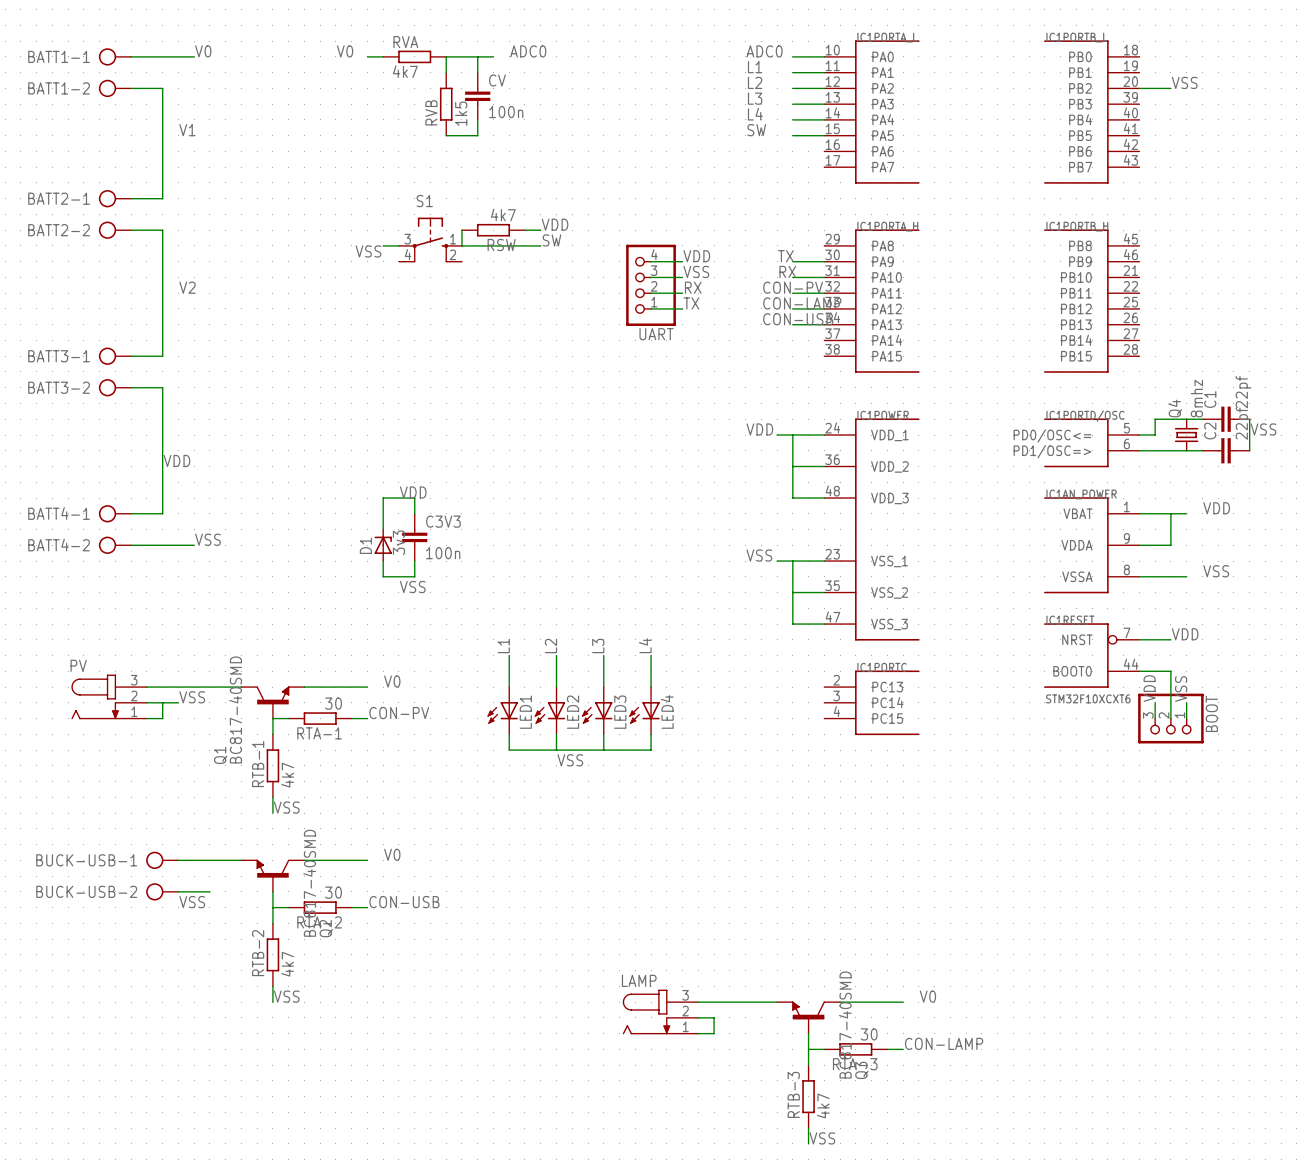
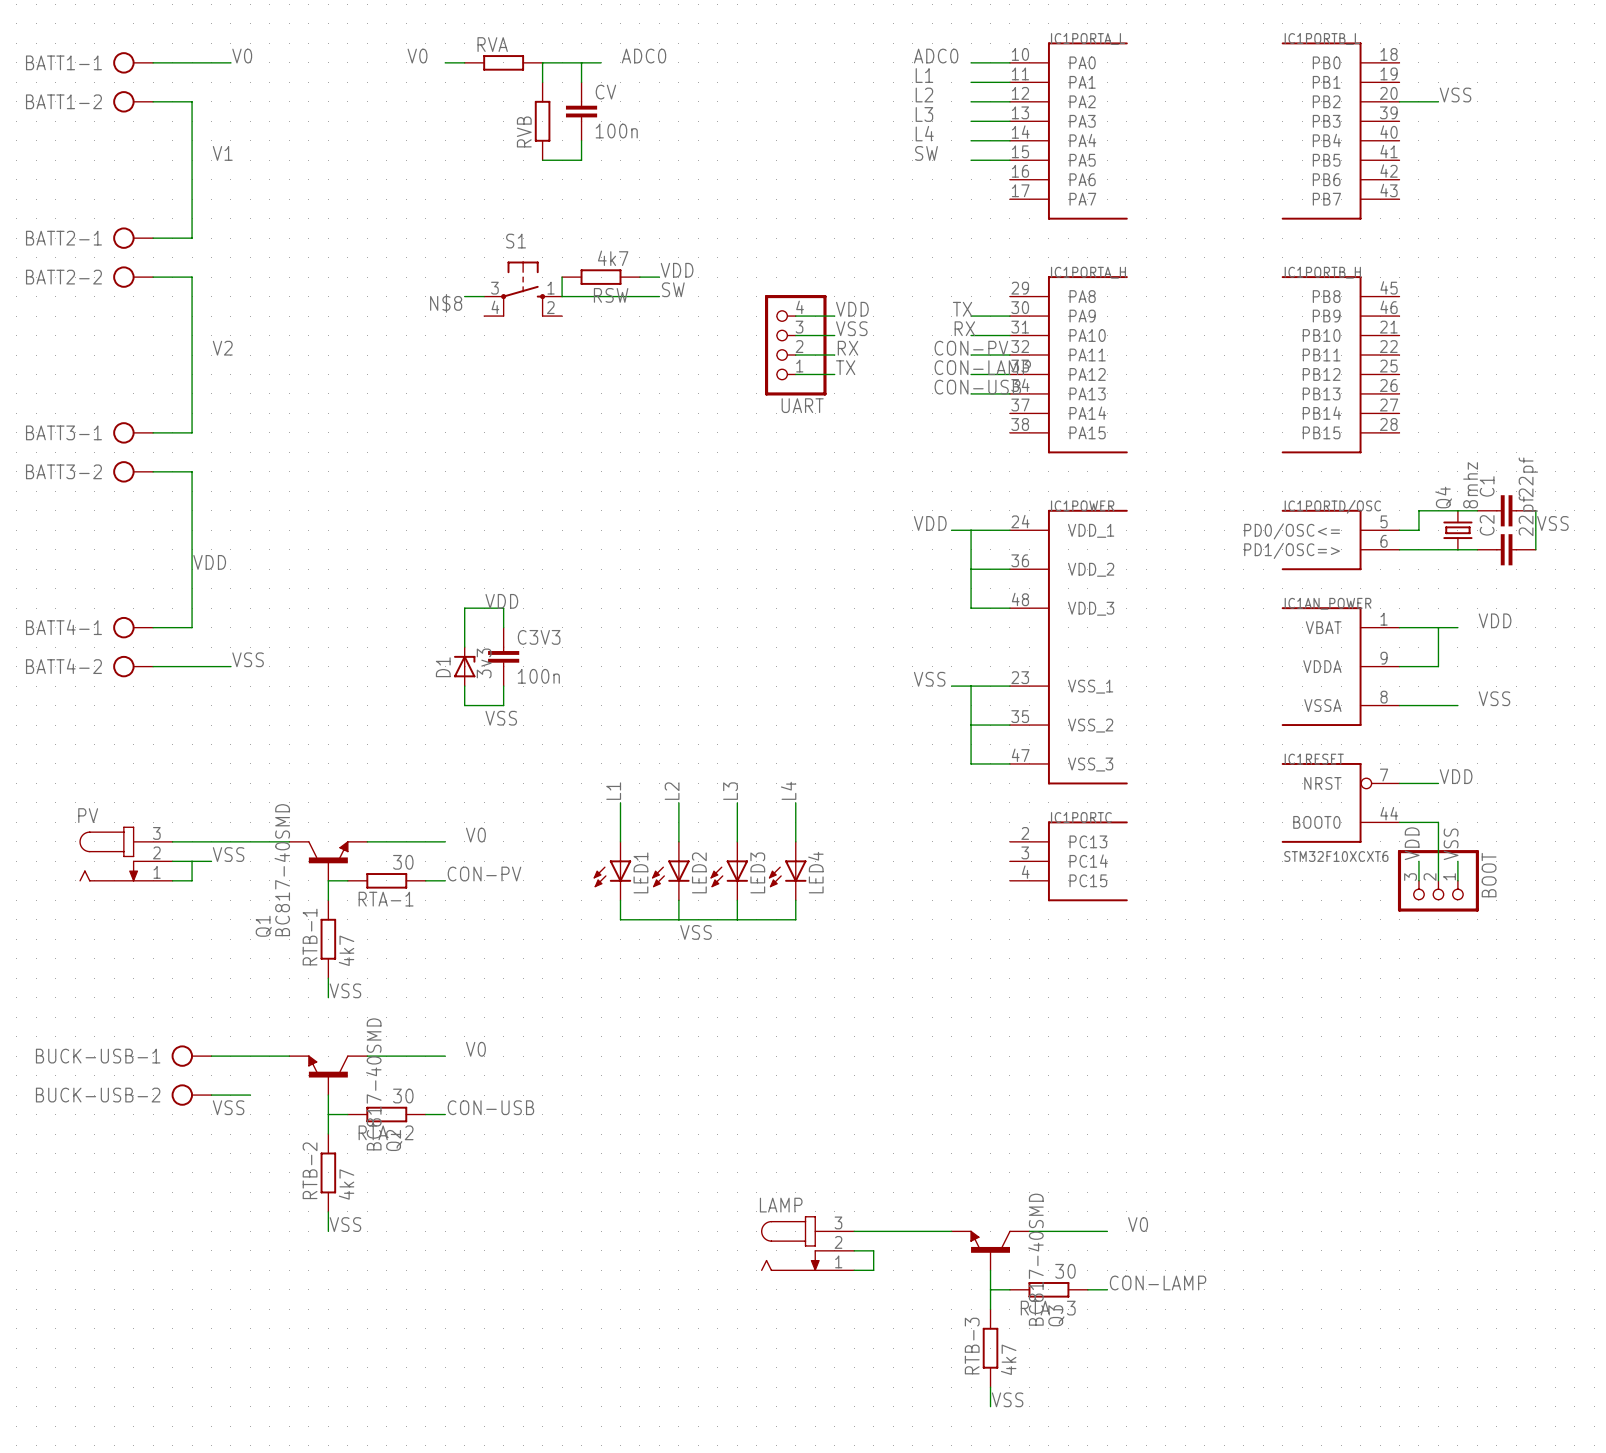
RVA value: 4k7 (405, 71) -> none
RVB value: 1k5 (461, 113) -> none
label: VSS (368, 251) -> N$8 (446, 303)

